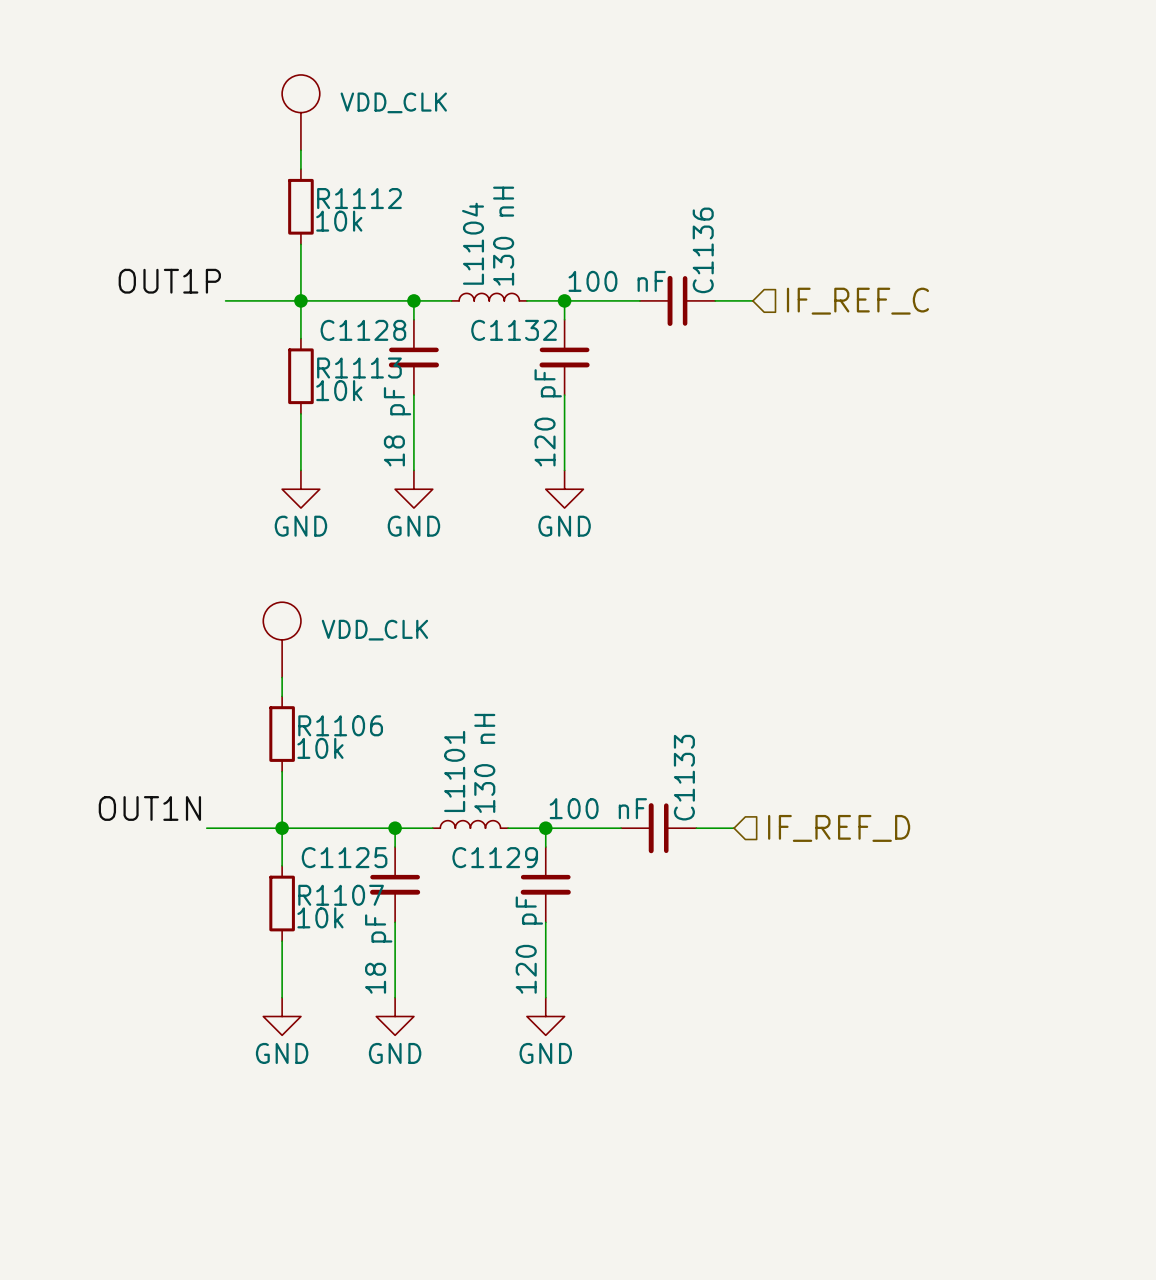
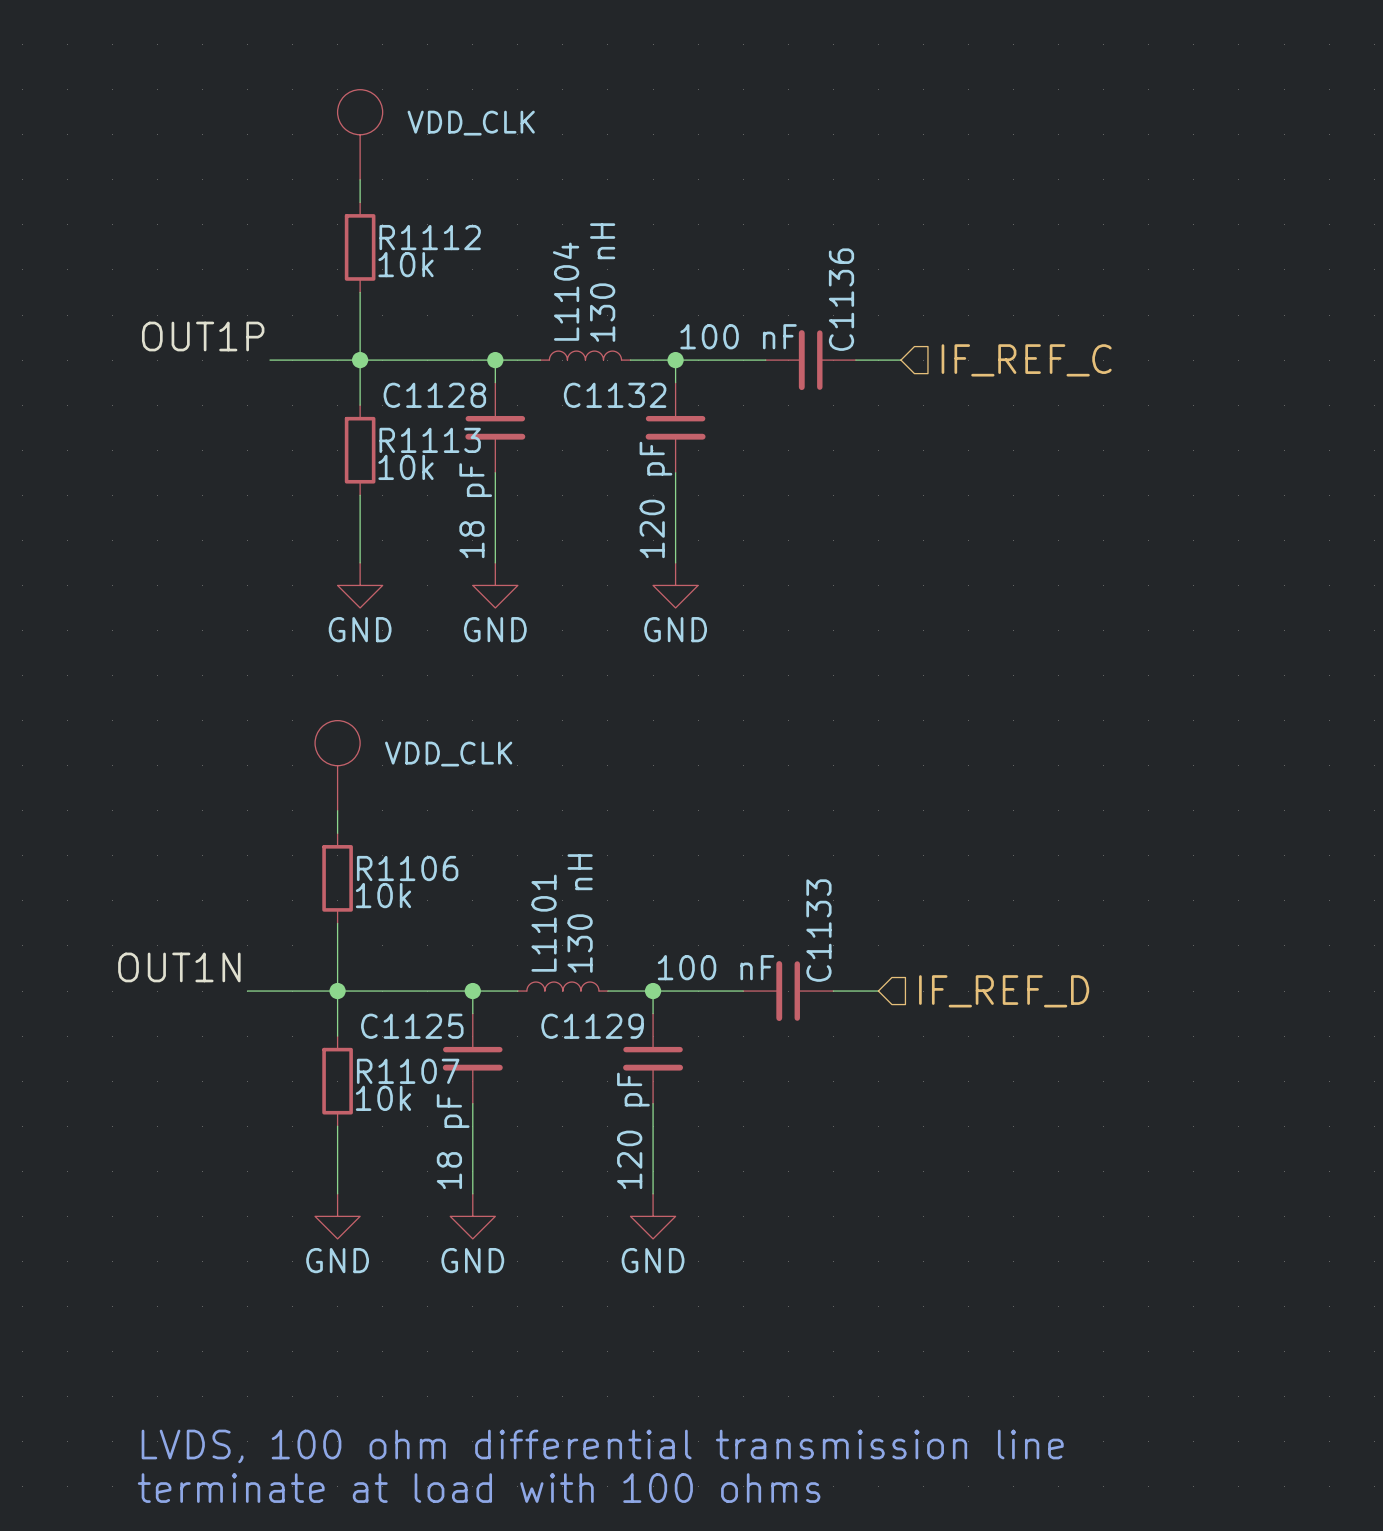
text: none -> LVDS, 100 ohm differential transmission line (602, 1446)
text: none -> terminate at load with 100 ohms (479, 1488)

